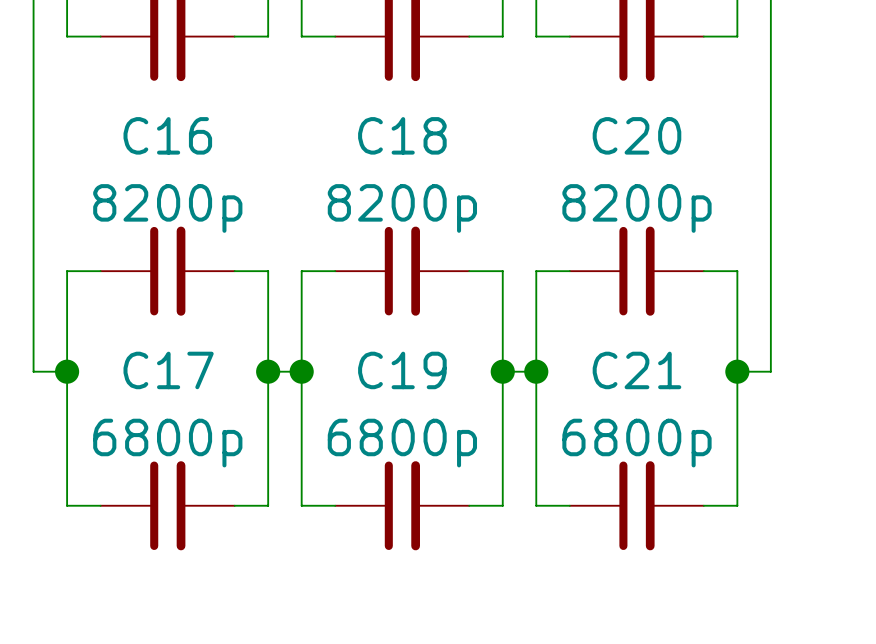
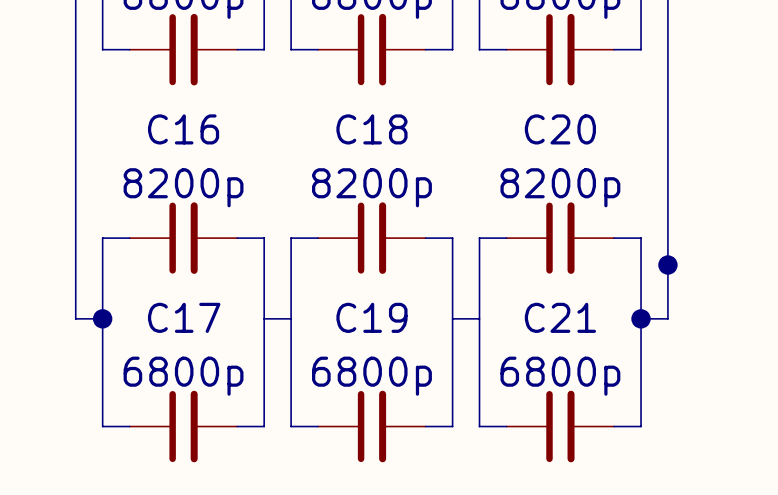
junction: none -> (667, 265)
junction: (268, 371) -> none
junction: (301, 371) -> none
junction: (502, 371) -> none
junction: (536, 371) -> none

